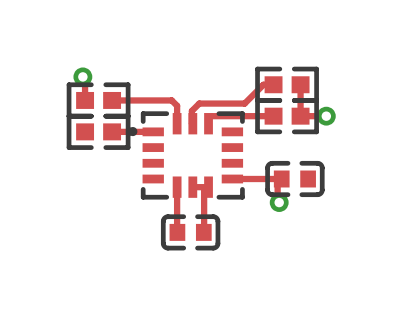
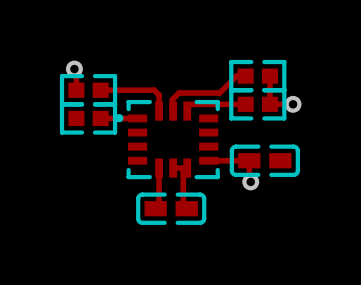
part footprint: [265, 160, 325, 198] -> [229, 144, 300, 177]
part footprint: [160, 214, 221, 251] -> [136, 192, 207, 225]

